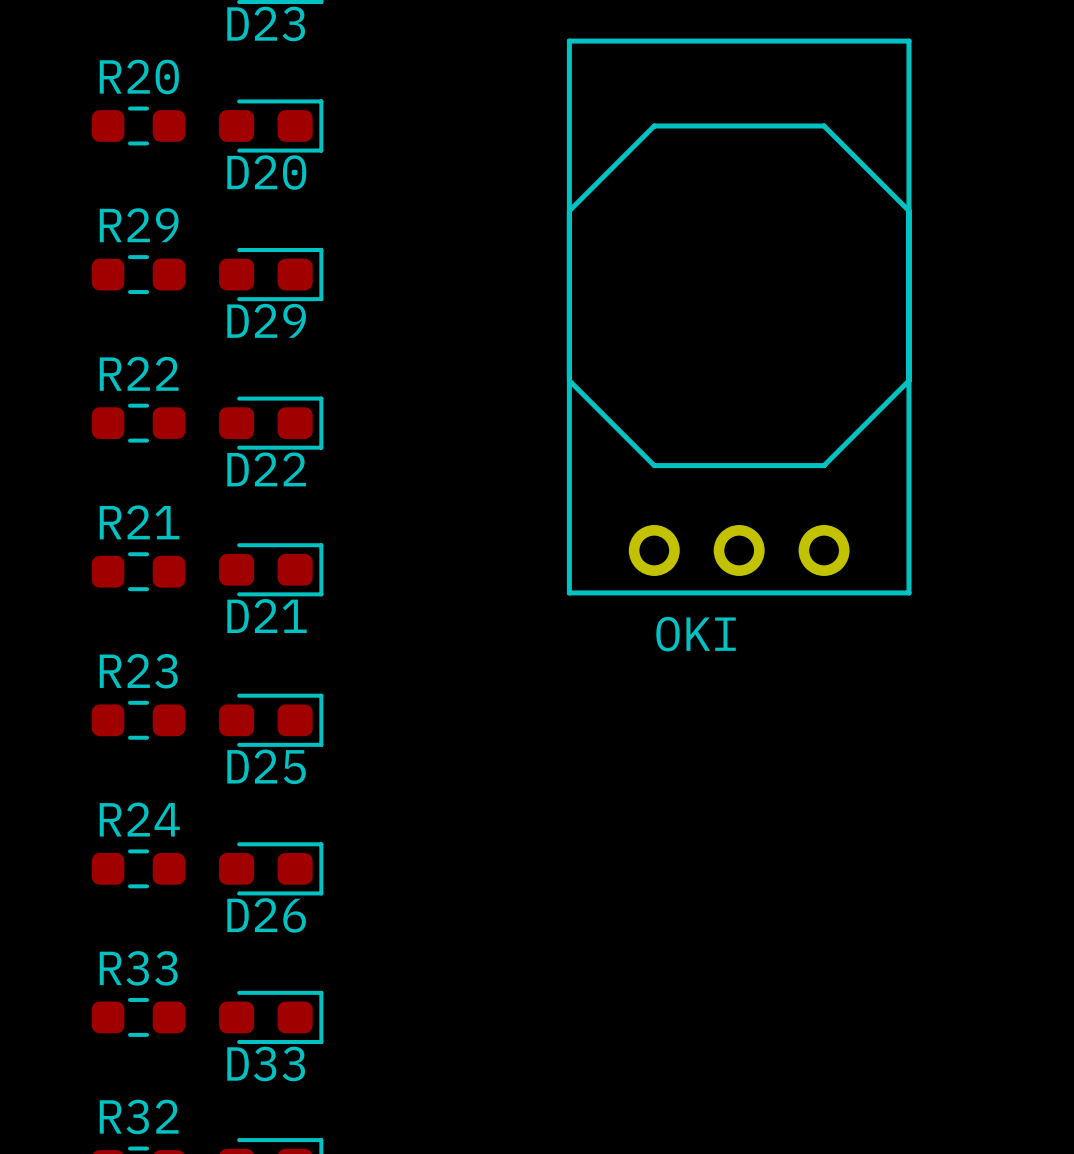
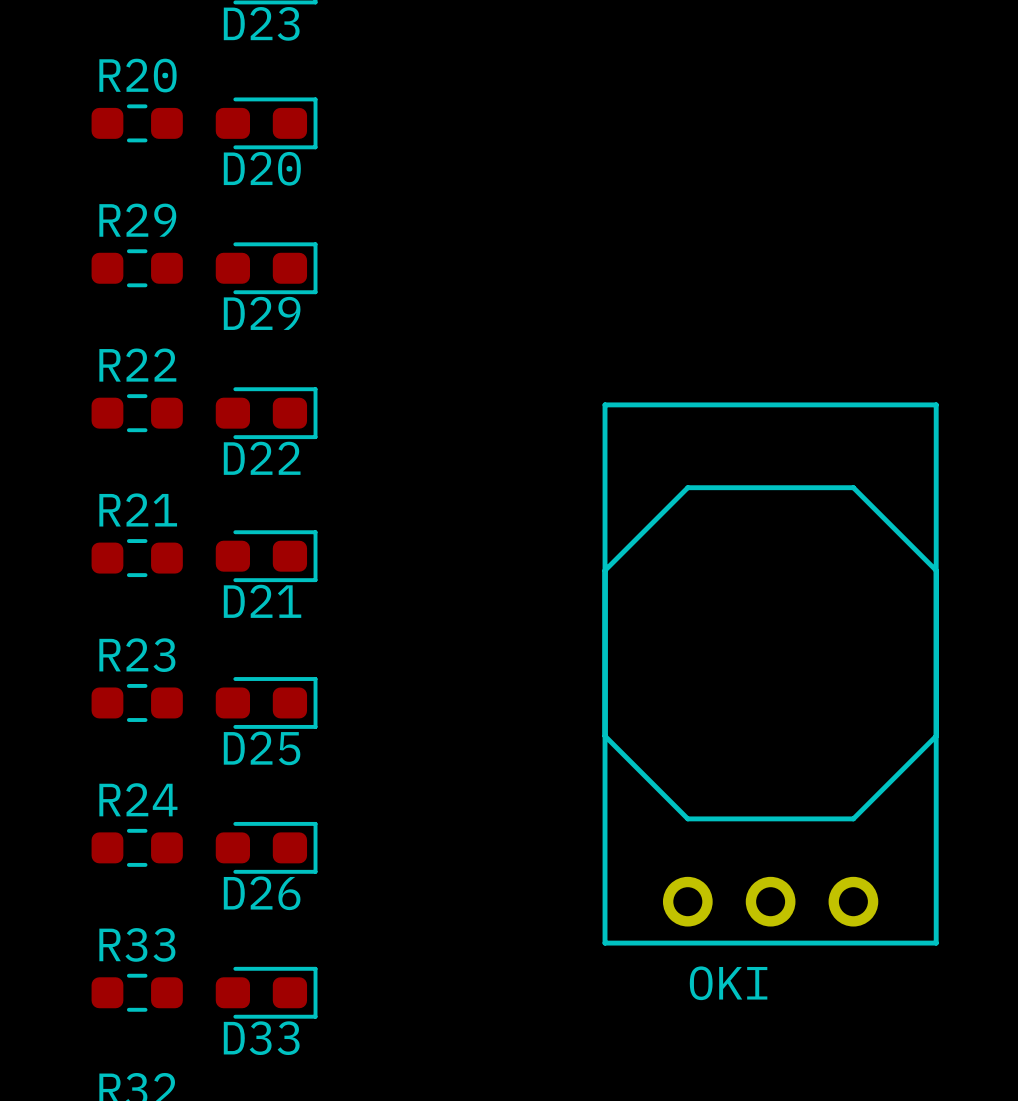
part position: (739, 317) -> (770, 673)

